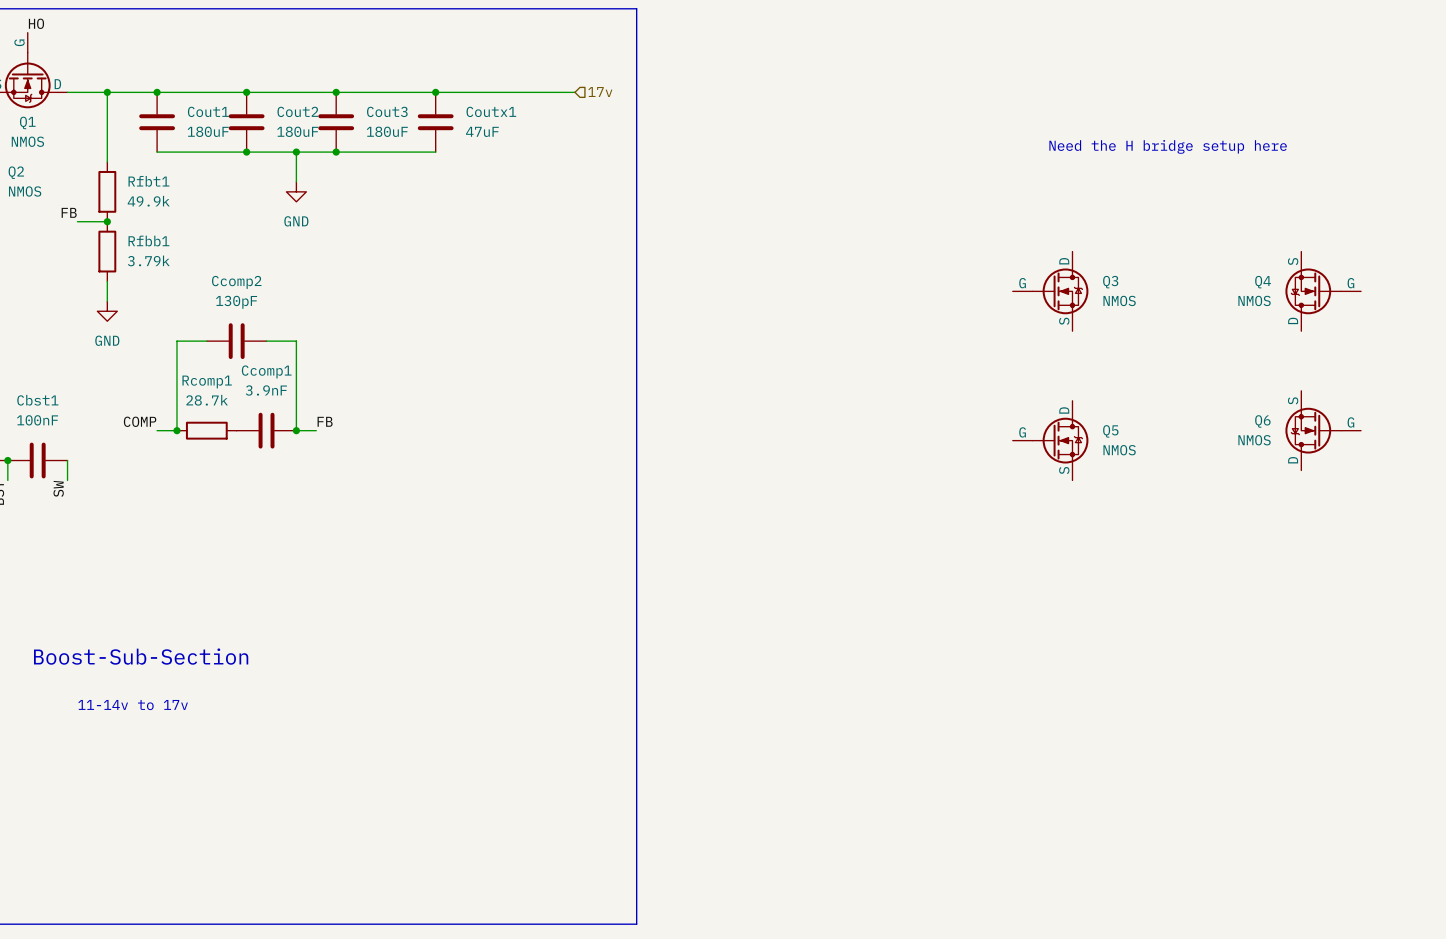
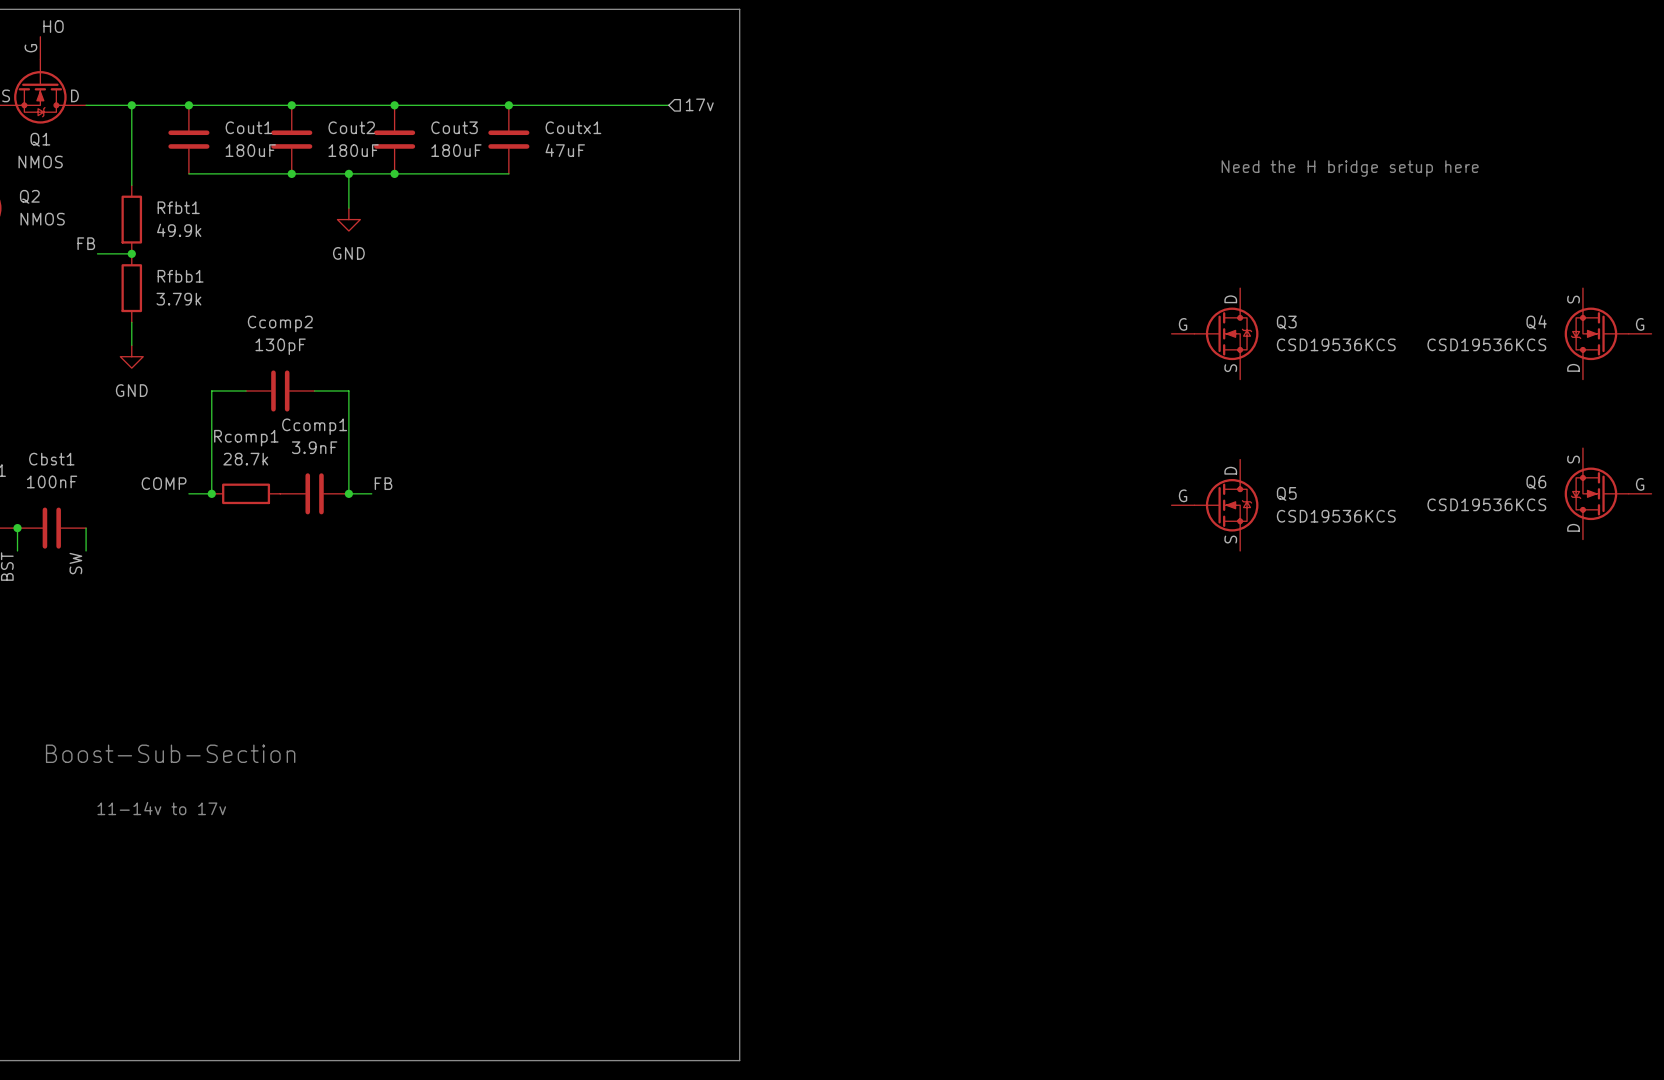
Q4 position: (1323, 291) -> (1608, 333)
Q3 value: NMOS (1119, 300) -> CSD19536KCS (1336, 344)
Q4 value: NMOS (1254, 300) -> CSD19536KCS (1486, 344)
Q6 position: (1323, 430) -> (1608, 493)
Q6 value: NMOS (1254, 440) -> CSD19536KCS (1486, 504)
Q5 value: NMOS (1119, 450) -> CSD19536KCS (1336, 516)

